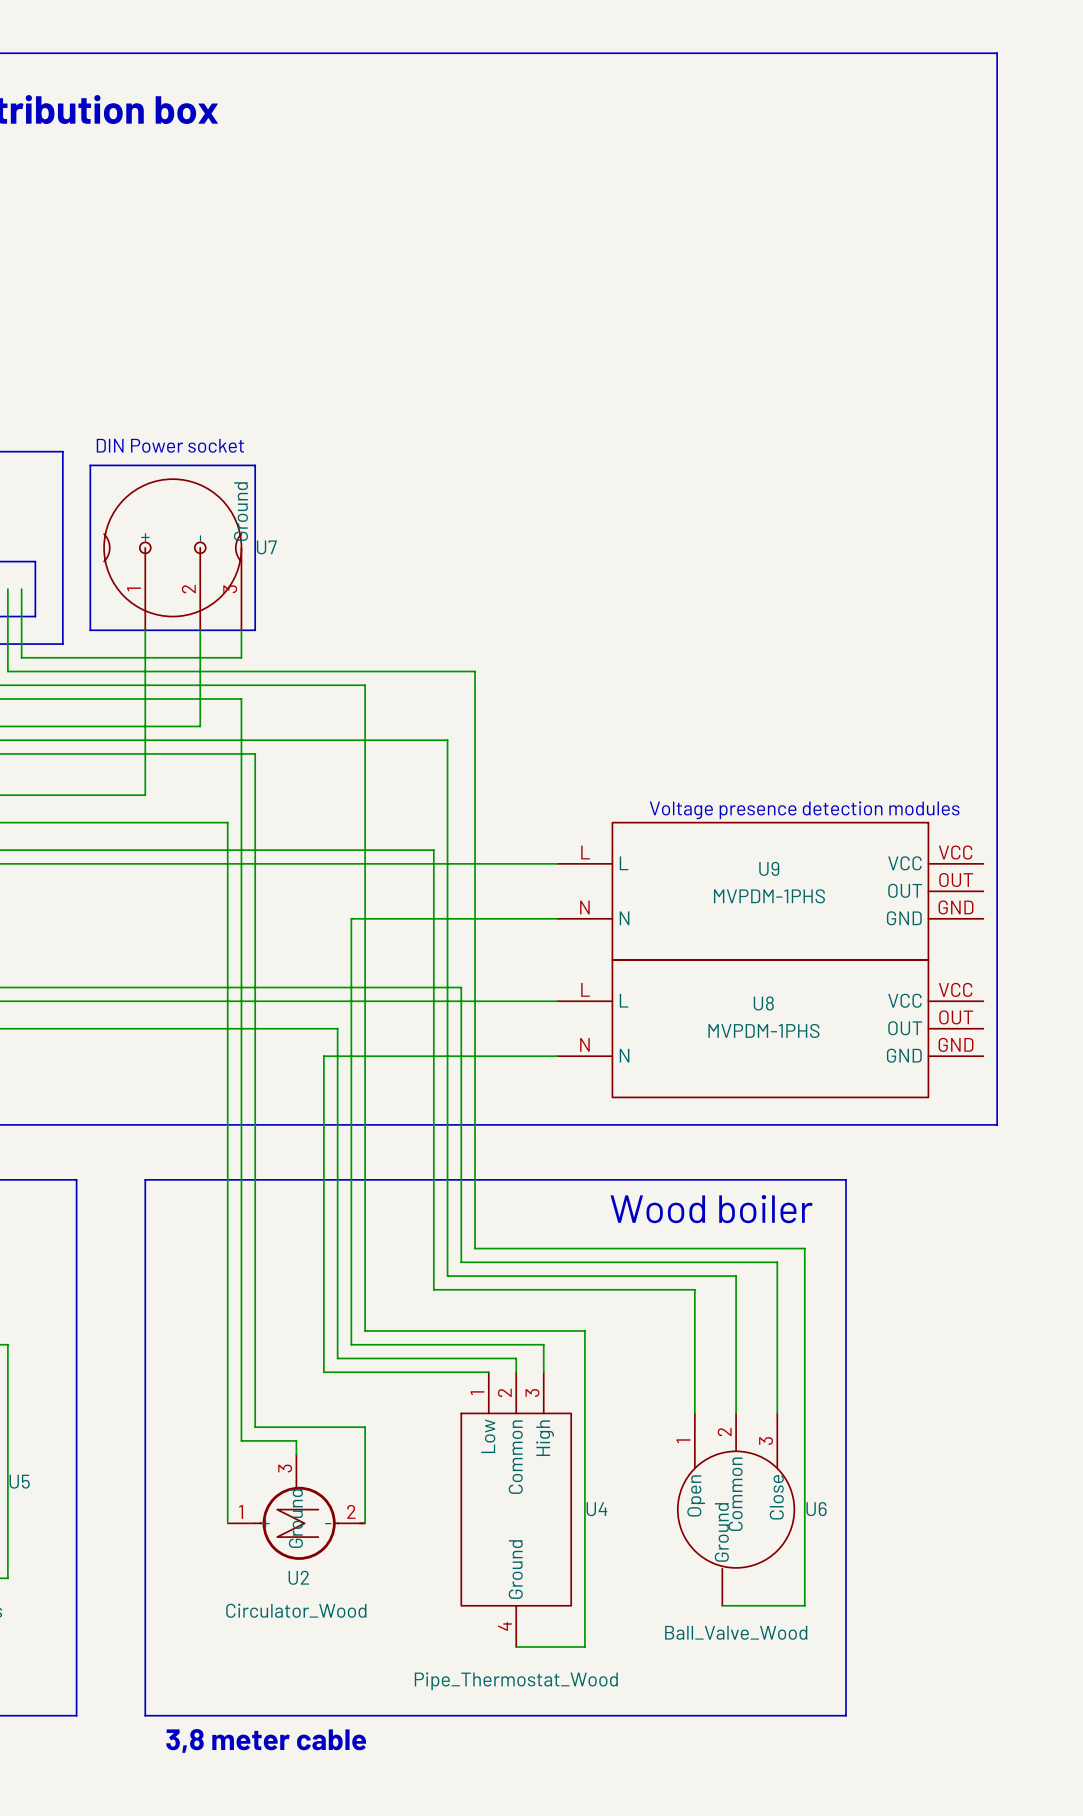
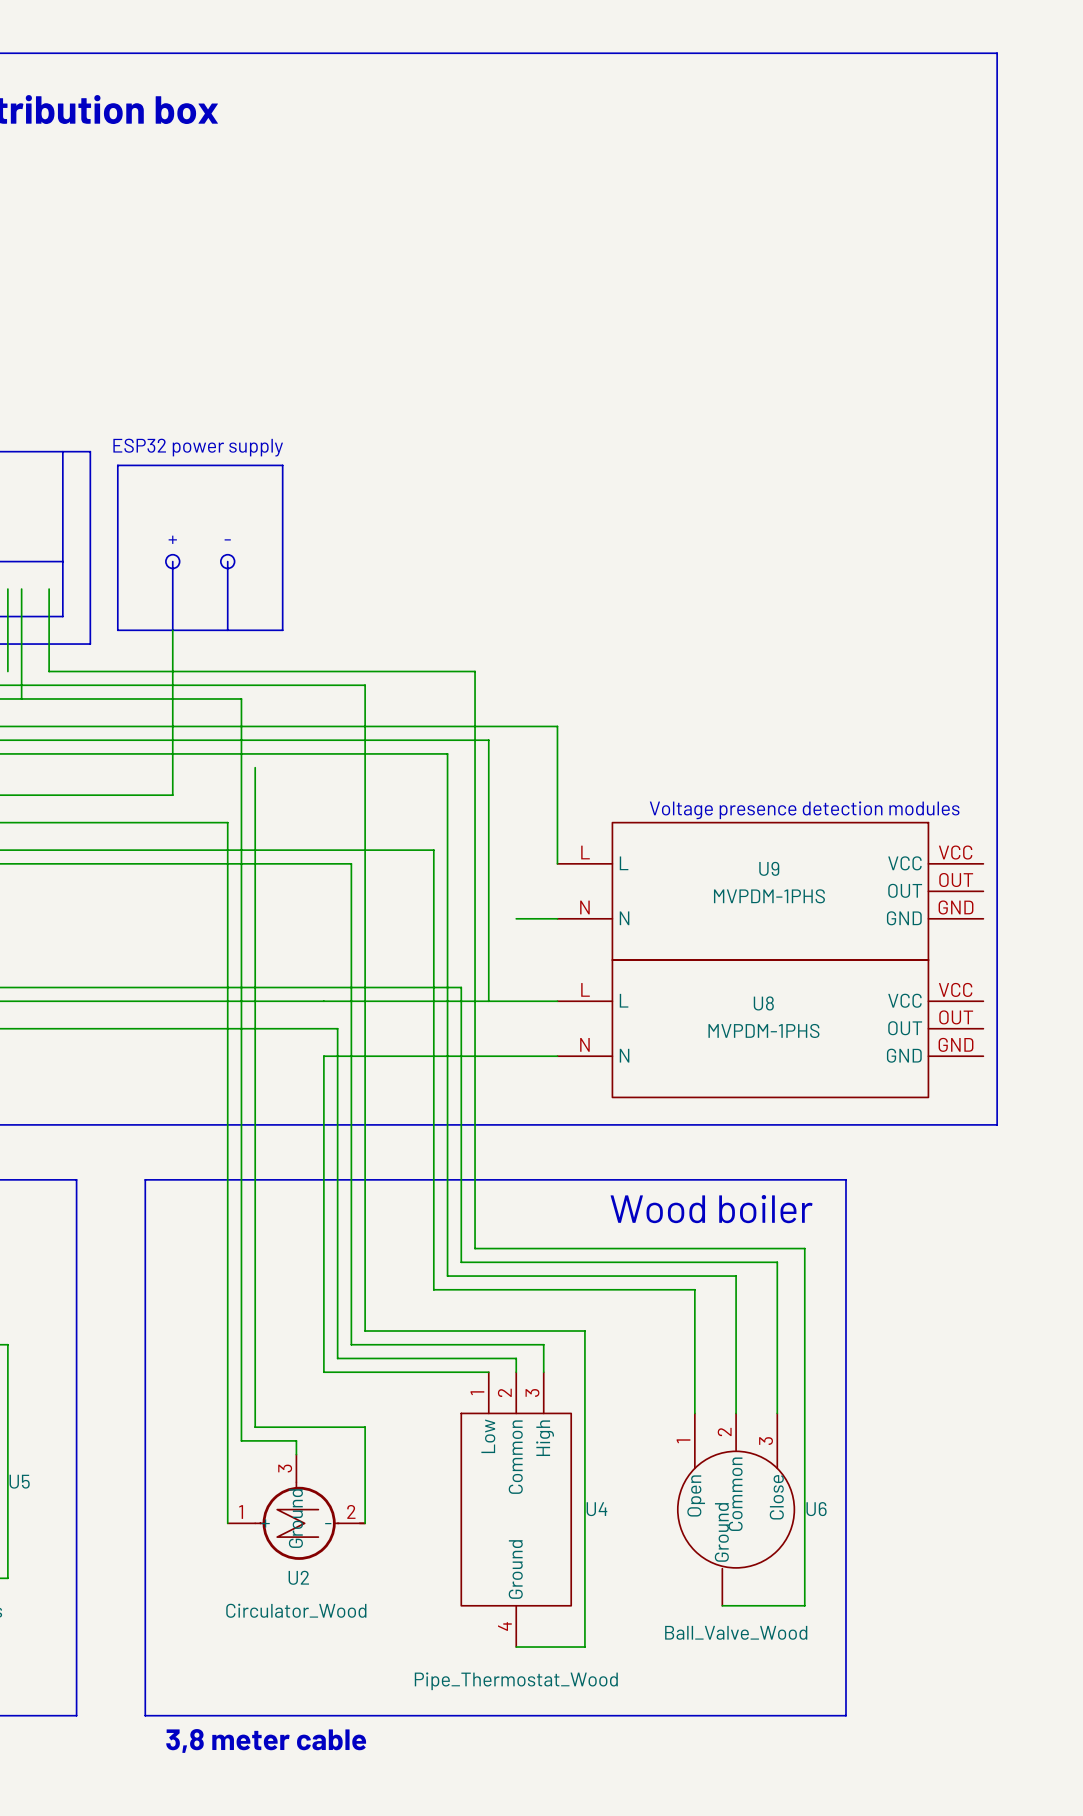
text: DIN Power socket (170, 445) -> none
text: none -> ESP32 power supply (198, 447)
line: (90, 465) (117, 465) -> (90, 465) (90, 451) (62, 451)
line: (255, 465) (255, 630) -> (255, 465) (282, 465) (282, 630) (255, 630)
text: none -> + (172, 539)
text: none -> - (227, 539)
drawing: none -> [165, 554, 180, 569]
U7: (172, 554) -> none
drawing: none -> [220, 554, 235, 569]
line: (35, 561) (35, 616) -> (35, 561) (62, 561)
line: none -> (172, 561) (172, 630)
line: none -> (227, 561) (227, 630)
line: none -> (35, 616) (62, 616)
line: (62, 616) (62, 644) -> (90, 630) (90, 644) (62, 644)
line: (90, 630) (117, 630) -> (117, 465) (117, 630)
wire: (145, 630) (145, 795) -> (172, 630) (172, 795) (145, 795)
wire: (200, 630) (200, 726) -> none
wire: (241, 630) (241, 657) (21, 657) -> (21, 698) (21, 657)
wire: (7, 671) (49, 671) -> (49, 589) (49, 671)
wire: (447, 740) (447, 753) -> (447, 740) (488, 740) (488, 1001)
wire: (255, 753) (255, 767) -> (255, 753) (447, 753)
wire: (351, 863) (557, 863) -> (200, 726) (557, 726) (557, 863)
wire: (351, 918) (516, 918) -> (351, 918) (351, 863)

